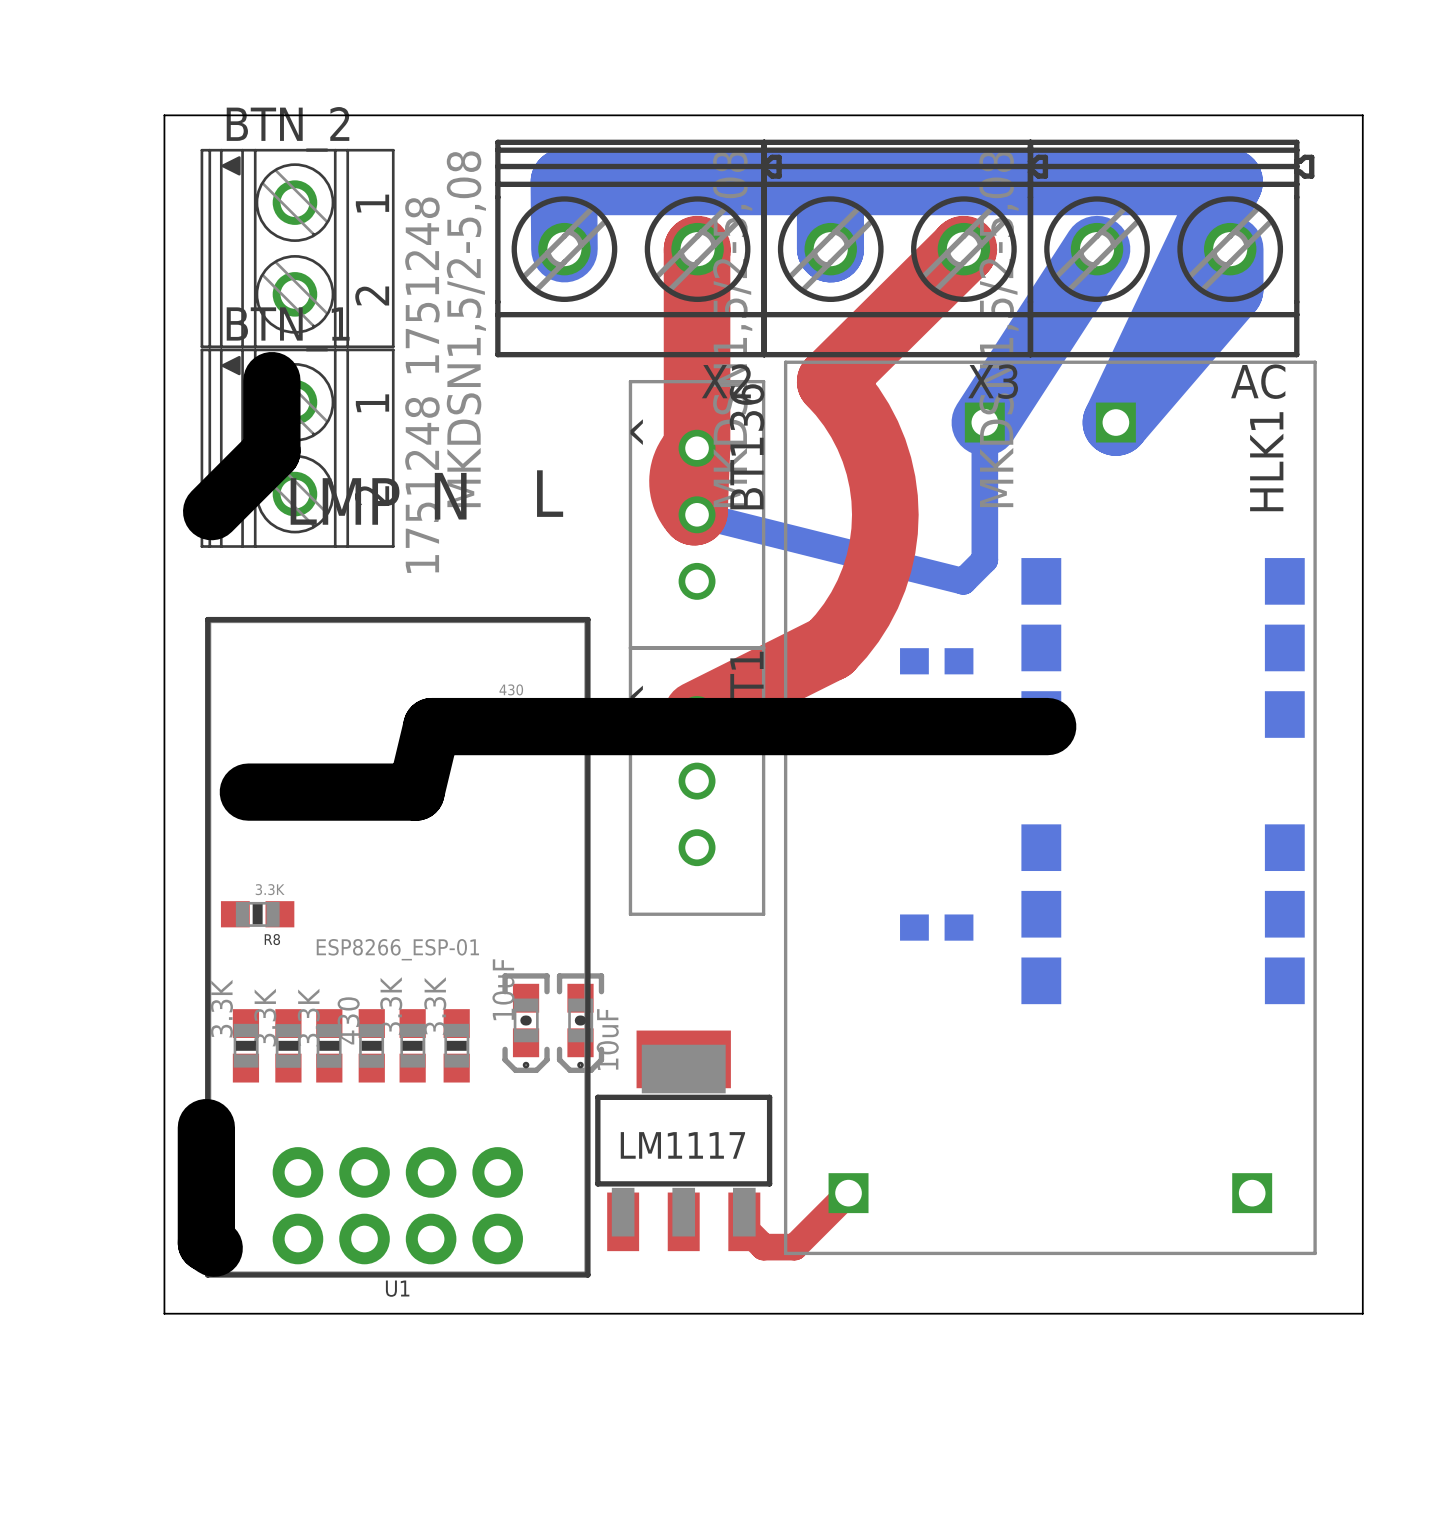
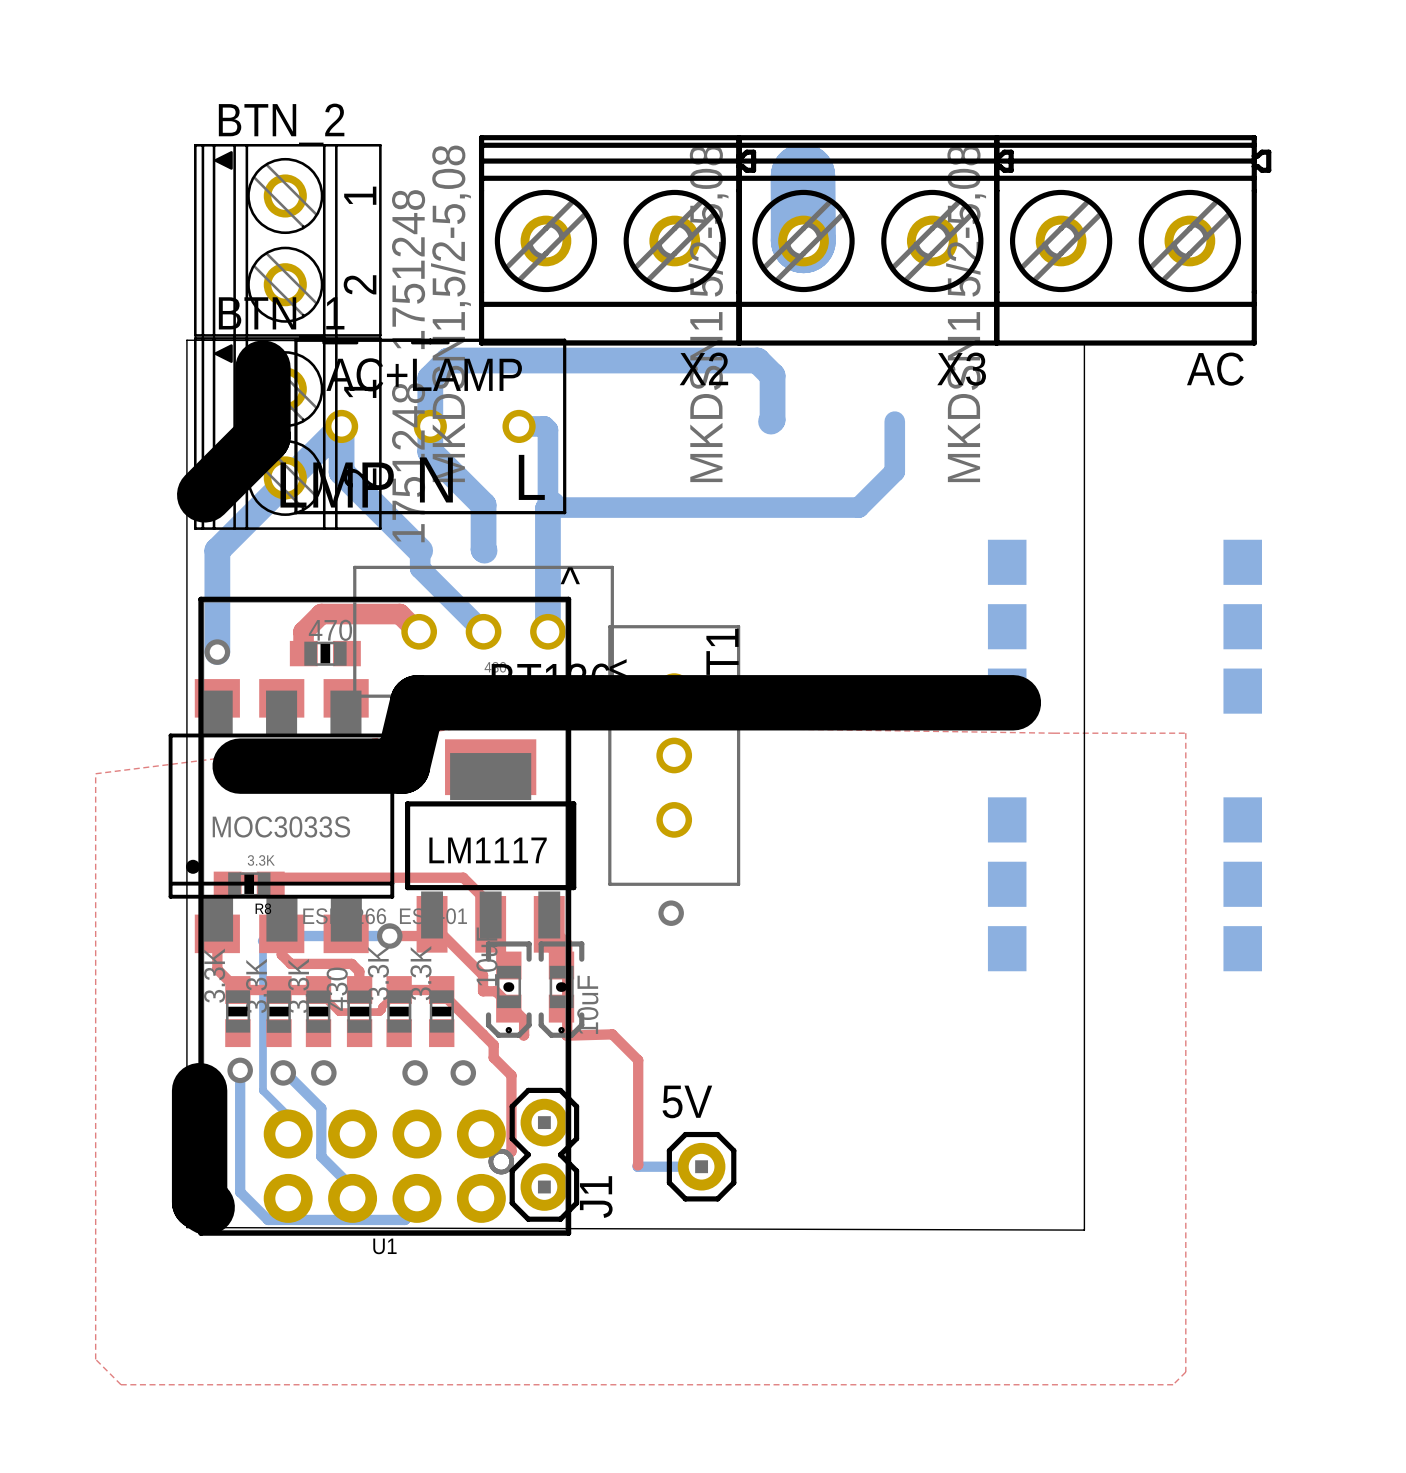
board edge: (164, 115) (1362, 115) (1362, 1313) (164, 1313) (164, 115) -> (186, 340) (186, 1227) (1084, 1230) (1084, 342) (186, 340)
bottom track: (564, 249) (563, 181) (1229, 181) (1115, 422) (1230, 289) (1230, 249) -> none
top track: (697, 249) (697, 448) -> none
top track: (963, 249) (830, 381) (860, 420) (873, 450) (882, 482) (885, 514) (882, 547) (873, 579) (860, 608) (830, 647) (697, 714) -> none
bottom track: (1097, 249) (984, 422) (984, 559) (963, 581) (697, 514) -> none
bottom track: none -> (771, 421) (772, 375) (757, 360) (448, 360) (430, 378) (430, 451) (483, 505) (484, 550)
bottom track: none -> (894, 421) (894, 471) (858, 507) (555, 507) (547, 499) (547, 429) (544, 426) (519, 426)
AC+LAMP: none -> (430, 426)
top track: (697, 448) (694, 512) (685, 497) (682, 479) (686, 462) (697, 448) -> none
BT136 rotation: 0° (697, 514) -> 90° clockwise (483, 631)
BT136 position: (697, 514) -> (483, 631)
bottom track: none -> (552, 504) (547, 509) (547, 631)
top track: none -> (419, 631) (399, 614) (321, 614) (303, 631) (303, 653)
bottom track: none -> (483, 631) (420, 568) (420, 550) (341, 472) (341, 426) (217, 550) (217, 652)
part side: bottom (936, 661) -> top (325, 653)
via: none -> (217, 652)
top zone outline: none -> (460, 728) (95, 773) (95, 1359) (121, 1384) (1173, 1384) (1185, 1372) (1185, 733) (721, 728) (460, 728)
HLK1: (1050, 807) -> none
part: none -> MOC3033S (281, 816)
part: (936, 927) -> none
via: none -> (671, 913)
top track: none -> (490, 924) (490, 905) (463, 877) (242, 877) (217, 903) (217, 969) (237, 990) (318, 990) (339, 1012) (379, 1012) (399, 990) (441, 990) (441, 993) (493, 1045) (493, 1057) (511, 1075) (511, 1151) (501, 1161)
top track: none -> (549, 924) (567, 943) (566, 1035) (612, 1034) (638, 1060) (637, 1165)
top track: none -> (281, 933) (281, 954) (290, 963) (351, 963) (359, 971) (359, 989)
top track: none -> (389, 936) (420, 936) (432, 924) (483, 975) (483, 991) (495, 991) (524, 1019) (523, 1035)
bottom track: none -> (389, 936) (268, 936) (262, 941) (262, 1090) (286, 1114) (286, 1122)
via: none -> (389, 936)
bottom track: none -> (240, 1070) (240, 1192) (268, 1219) (404, 1219) (415, 1209) (415, 1186)
via: none -> (240, 1070)
bottom track: none -> (283, 1072) (285, 1072) (321, 1108) (321, 1156) (351, 1186)
via: none -> (283, 1072)
via: none -> (323, 1072)
via: none -> (415, 1072)
via: none -> (463, 1072)
LM1117 position: (683, 1140) -> (490, 845)
J1: none -> (544, 1154)
top track: (848, 1193) (794, 1247) (763, 1247) (744, 1227) (744, 1221) -> none
via: none -> (501, 1161)
bottom track: none -> (637, 1165) (701, 1166)
5V: none -> (701, 1166)

